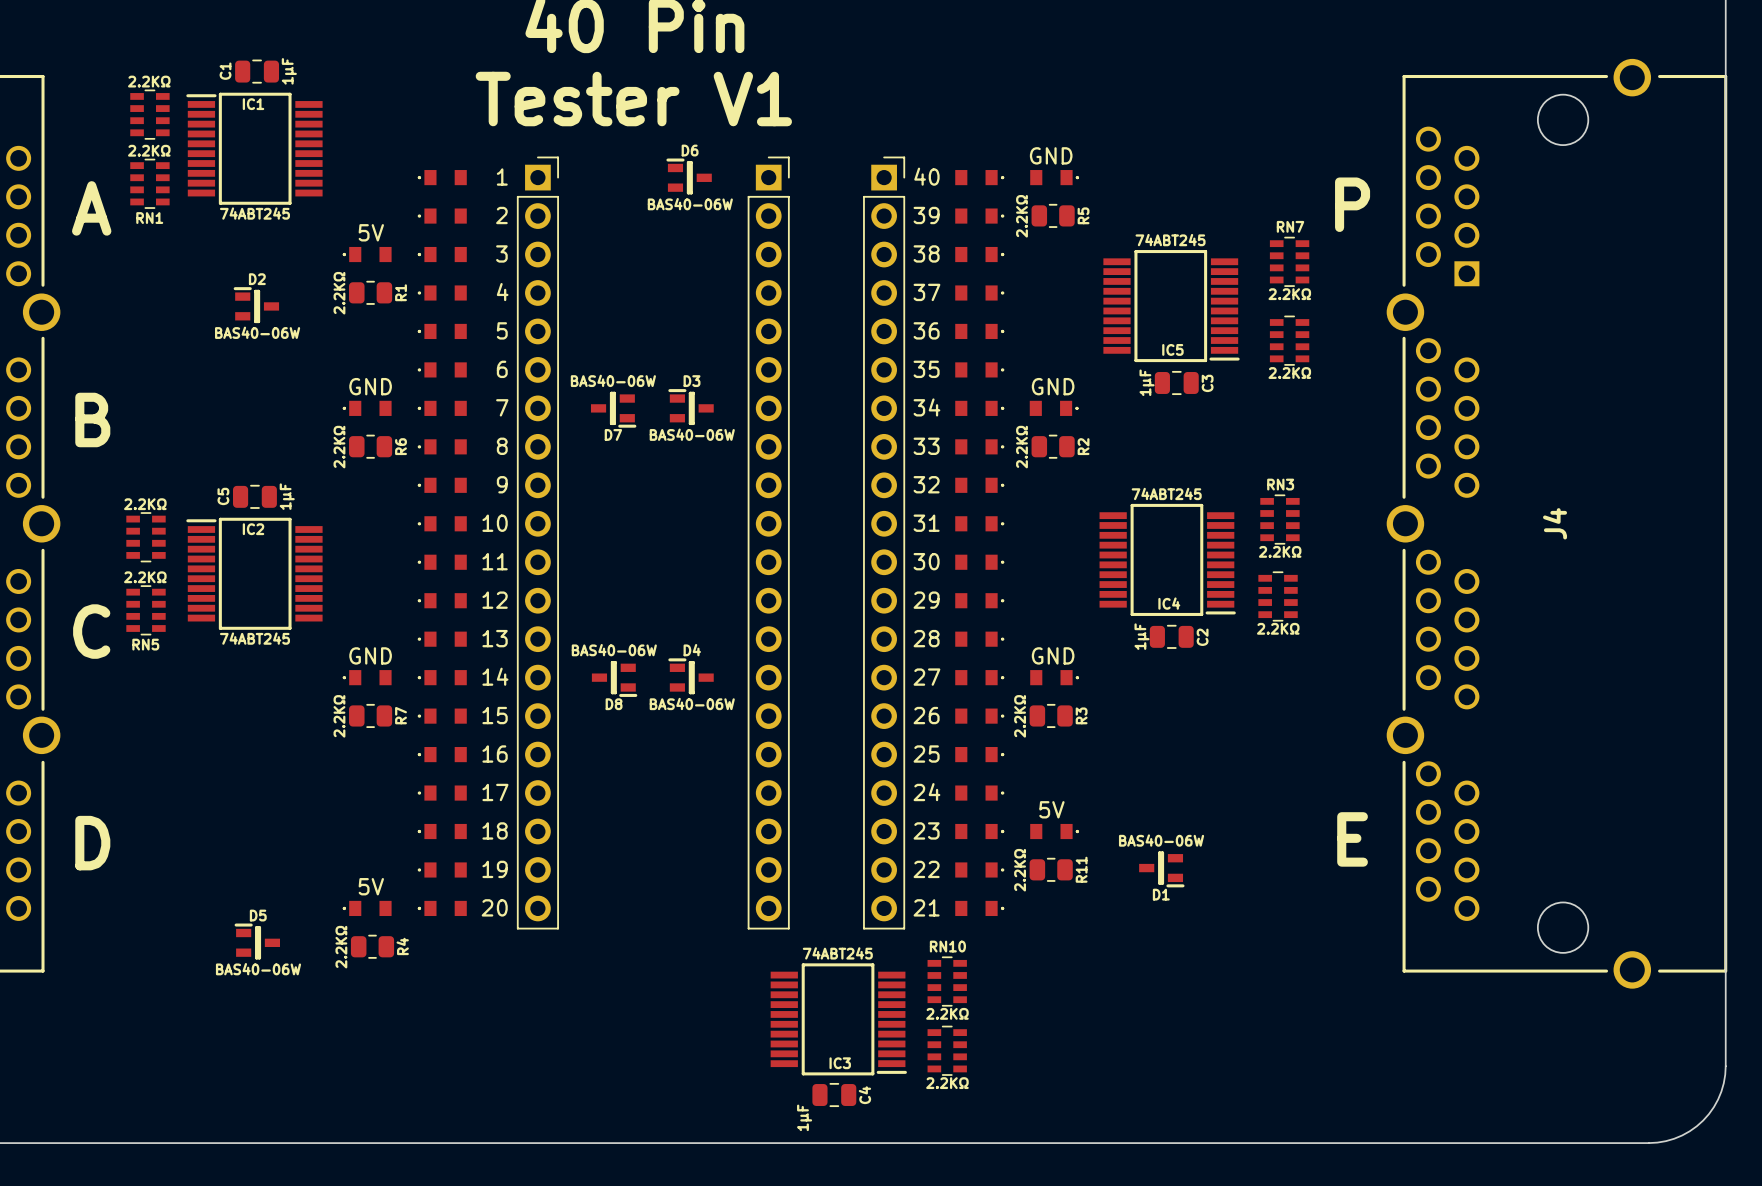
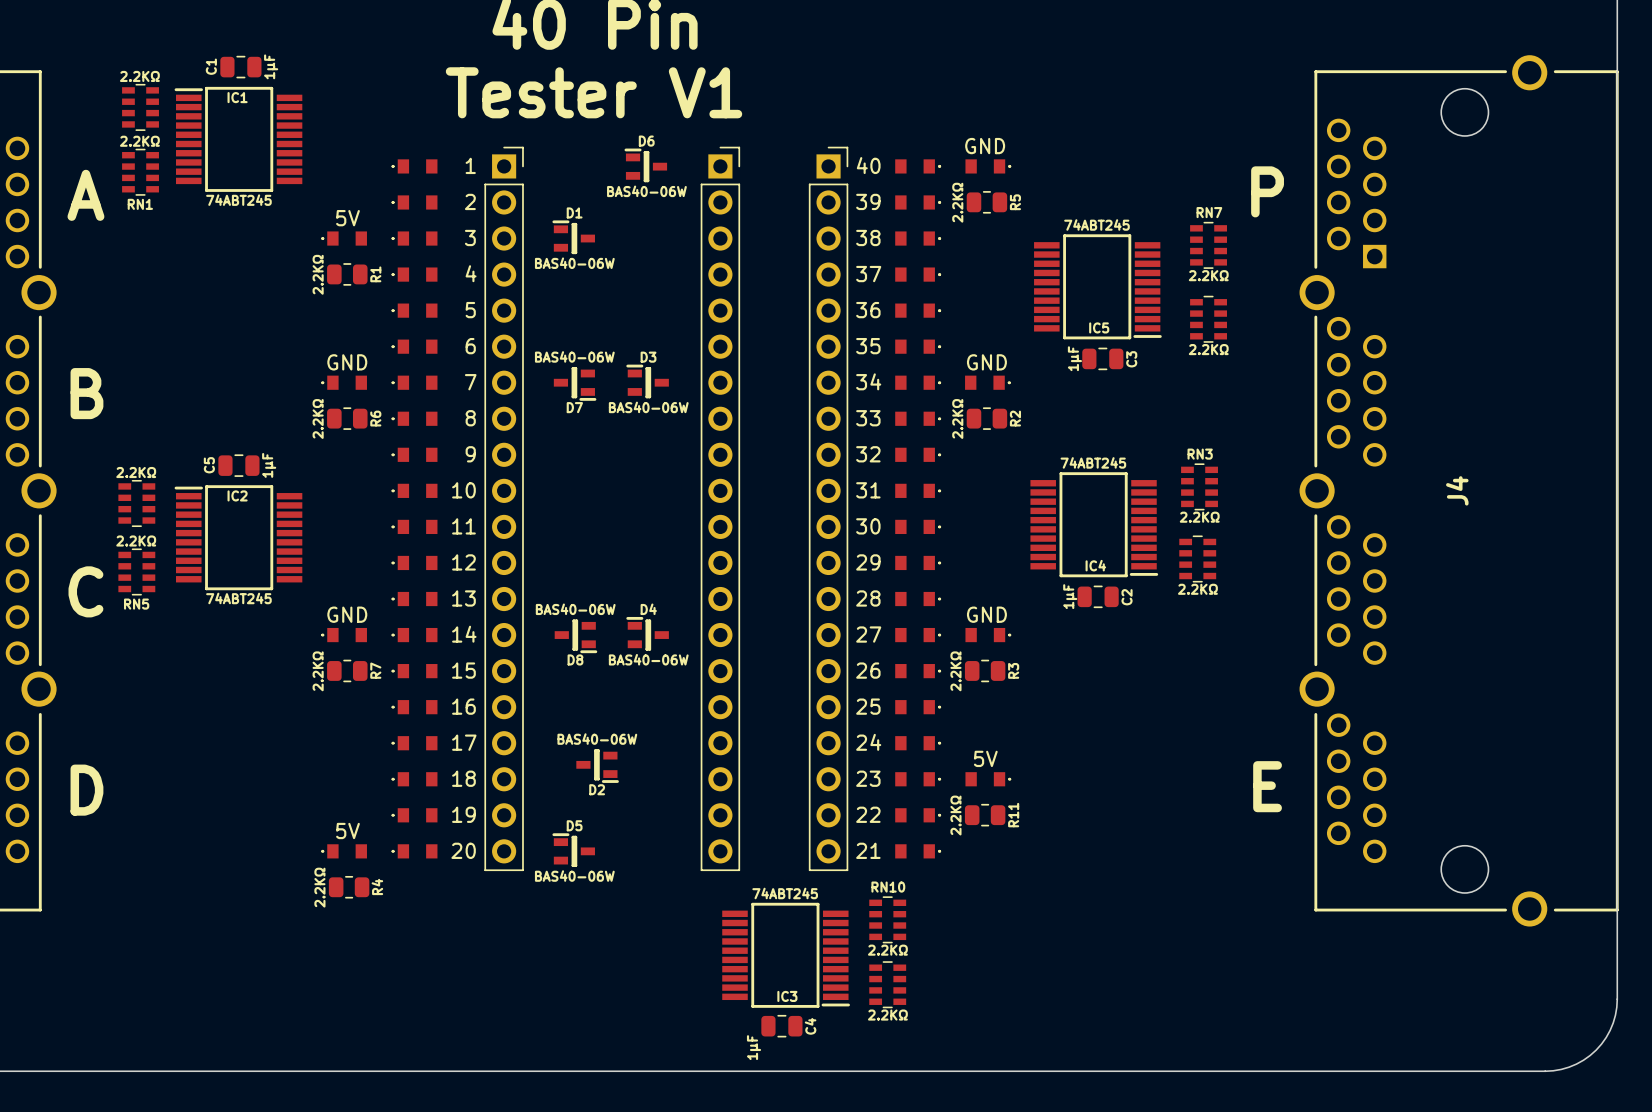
D2 rotation: 0° (256, 305) -> 180° (597, 766)
D2 position: (256, 305) -> (597, 766)
D1 rotation: 0° (1161, 869) -> 180° (573, 237)
D1 position: (1161, 869) -> (573, 237)
D5 position: (257, 941) -> (573, 850)

